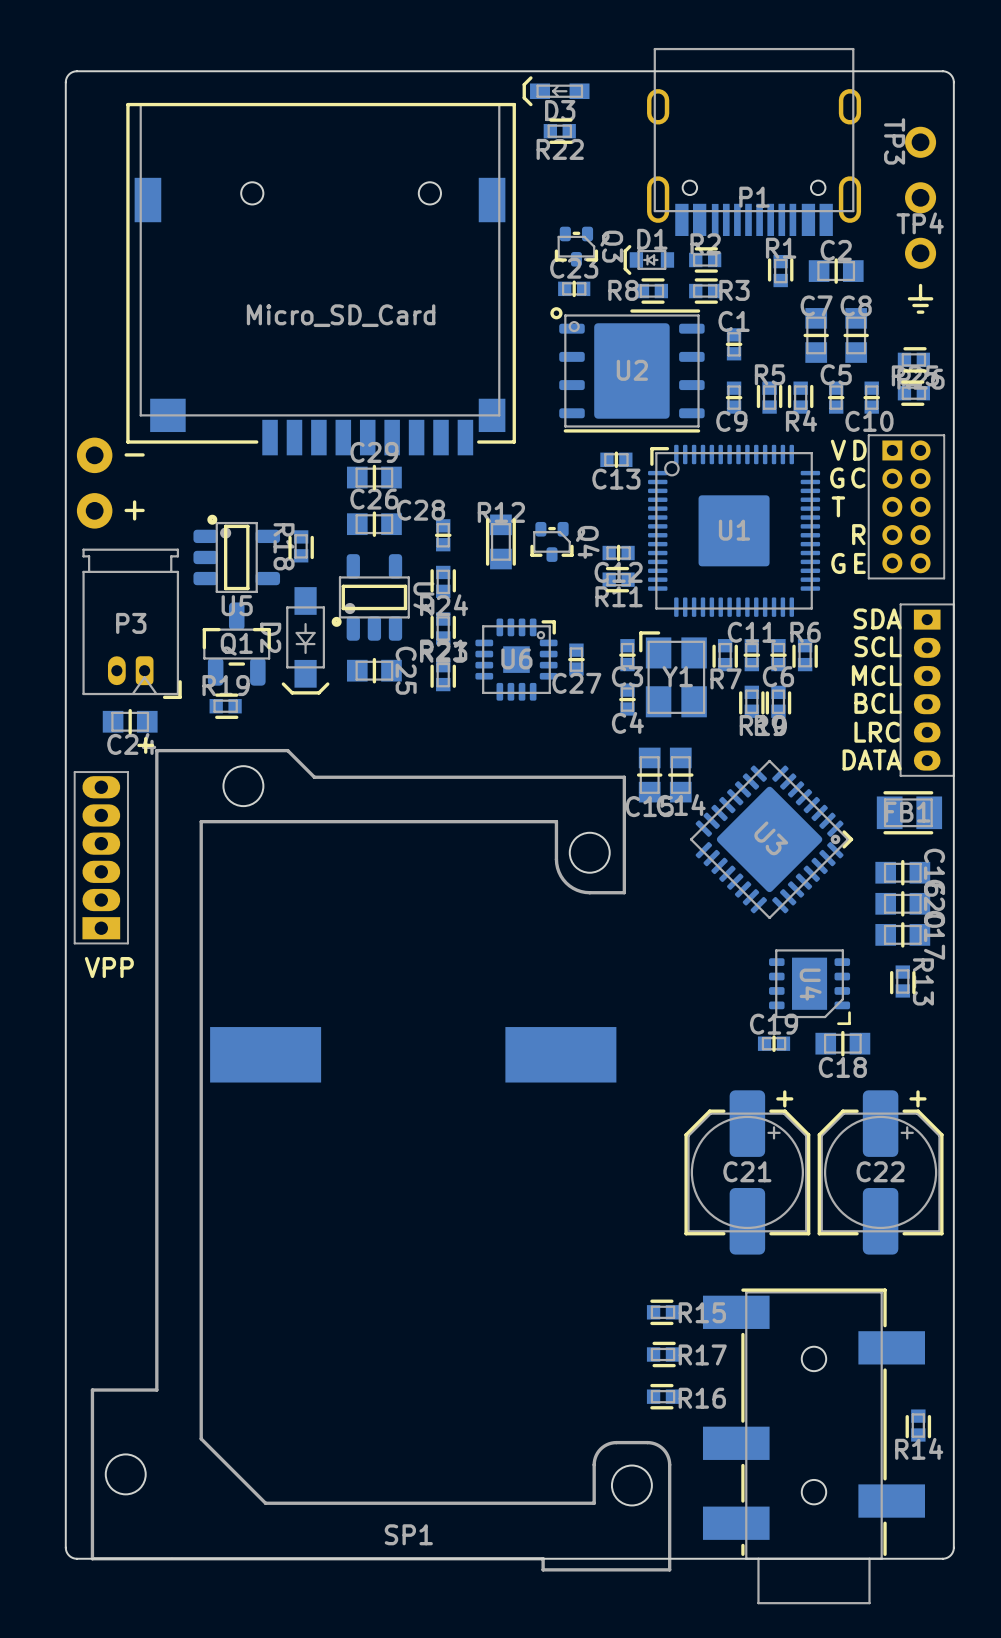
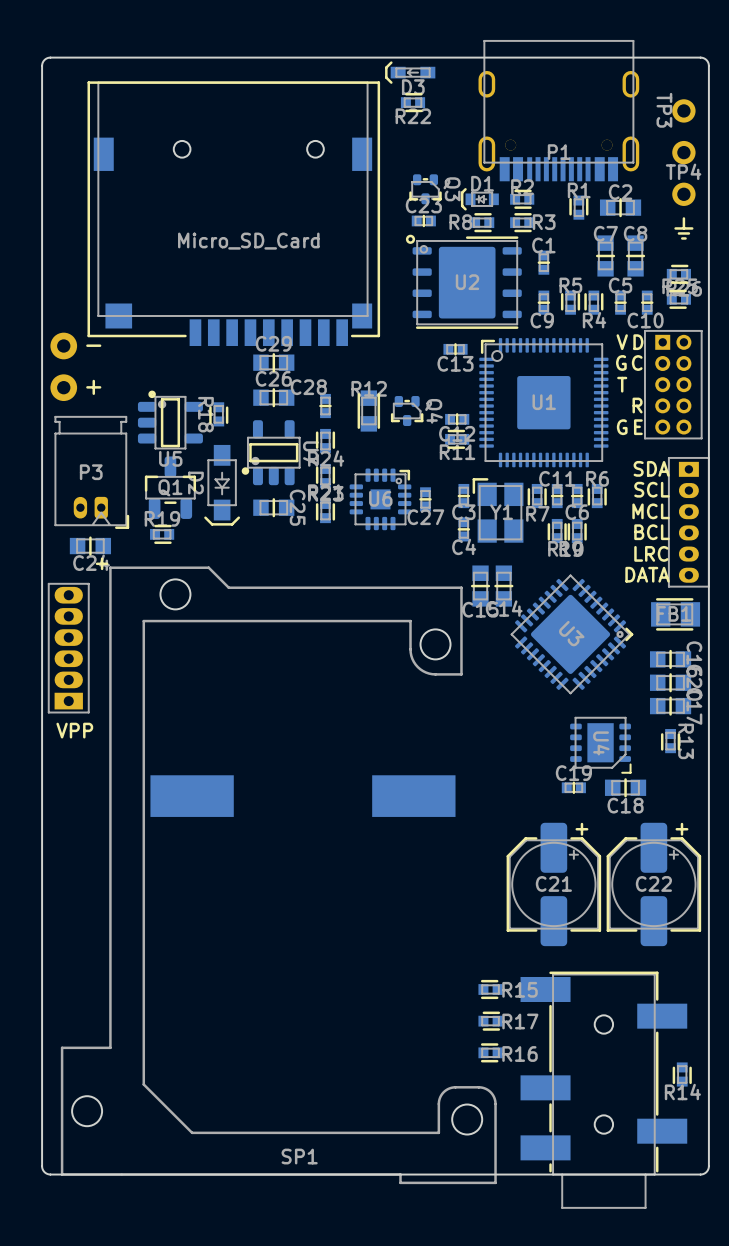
P1 footprint: [647, 47, 862, 237] -> [478, 40, 640, 182]

